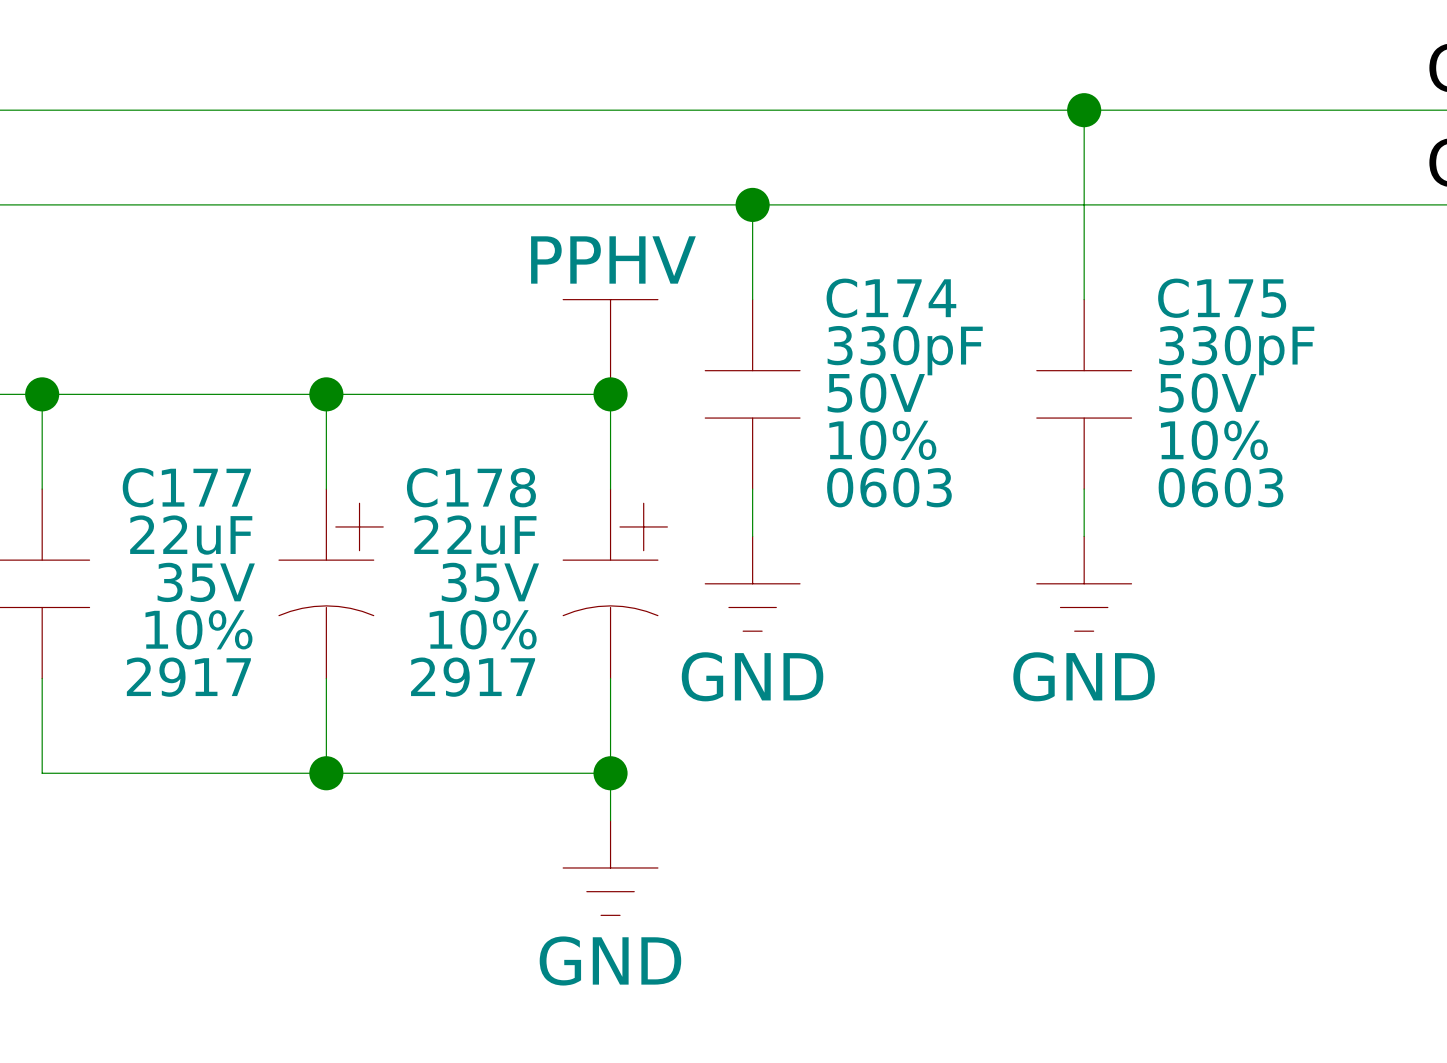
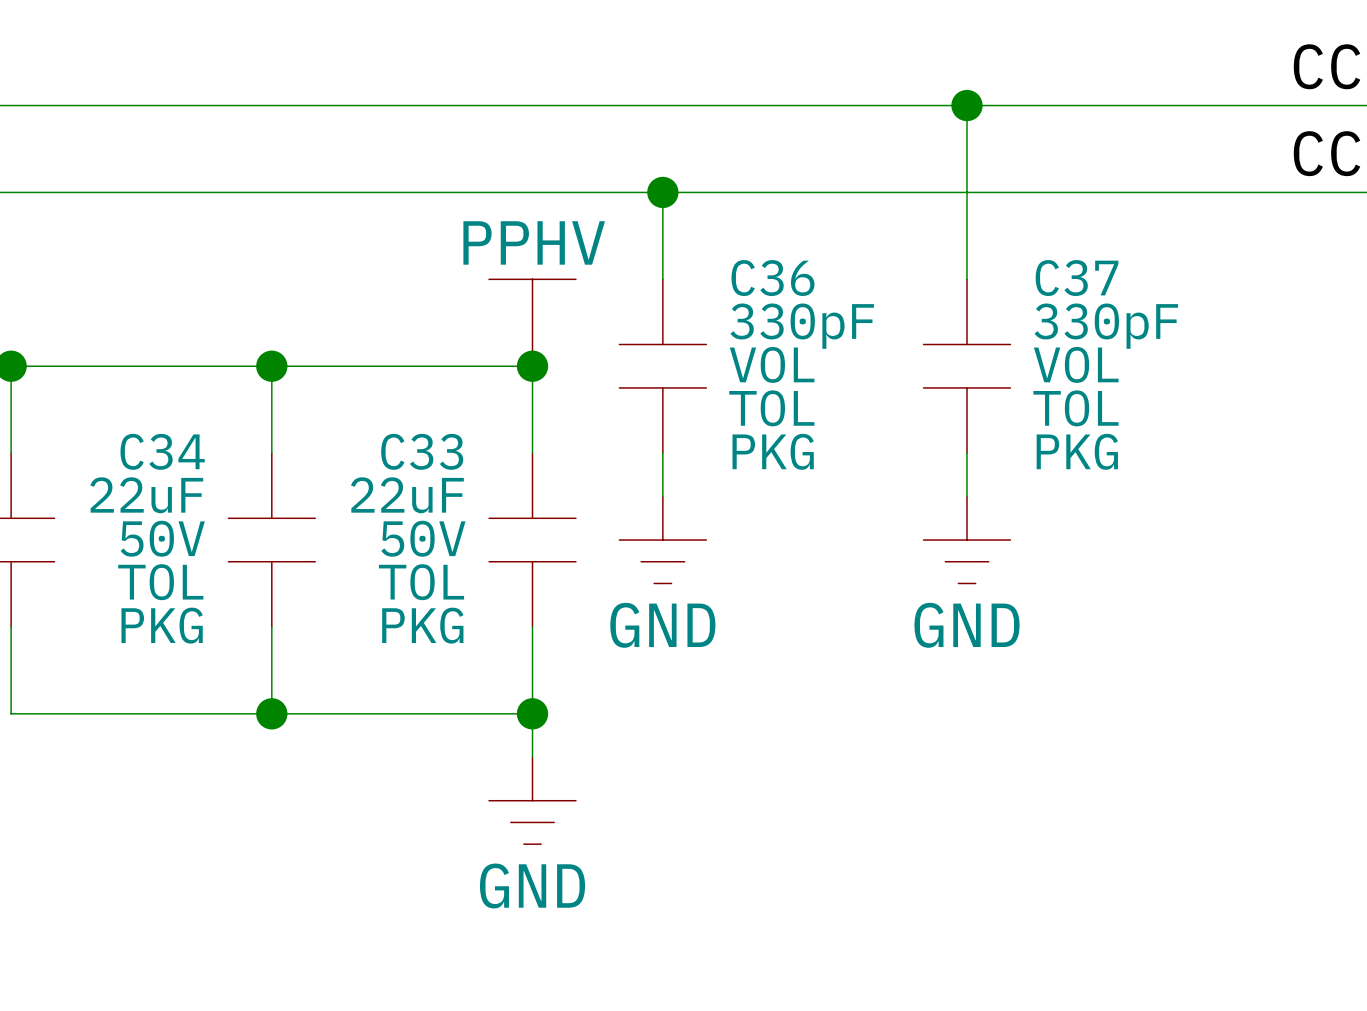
C174 name: C174 (891, 298) -> C36 (772, 278)
C175 name: C175 (1222, 298) -> C37 (1077, 278)
C174 text: 50V (876, 392) -> VOL (772, 364)
C175 text: 50V (1207, 392) -> VOL (1076, 364)
C174 text: 10% (882, 440) -> TOL (771, 408)
C175 text: 10% (1214, 440) -> TOL (1075, 408)
C174 text: 0603 (889, 487) -> PKG (773, 451)
C175 text: 0603 (1220, 487) -> PKG (1077, 451)
C34: none -> 22uF (271, 540)
C177: 22uF (331, 583) -> none
C33: none -> 22uF (532, 540)
C178: 22uF (615, 583) -> none

